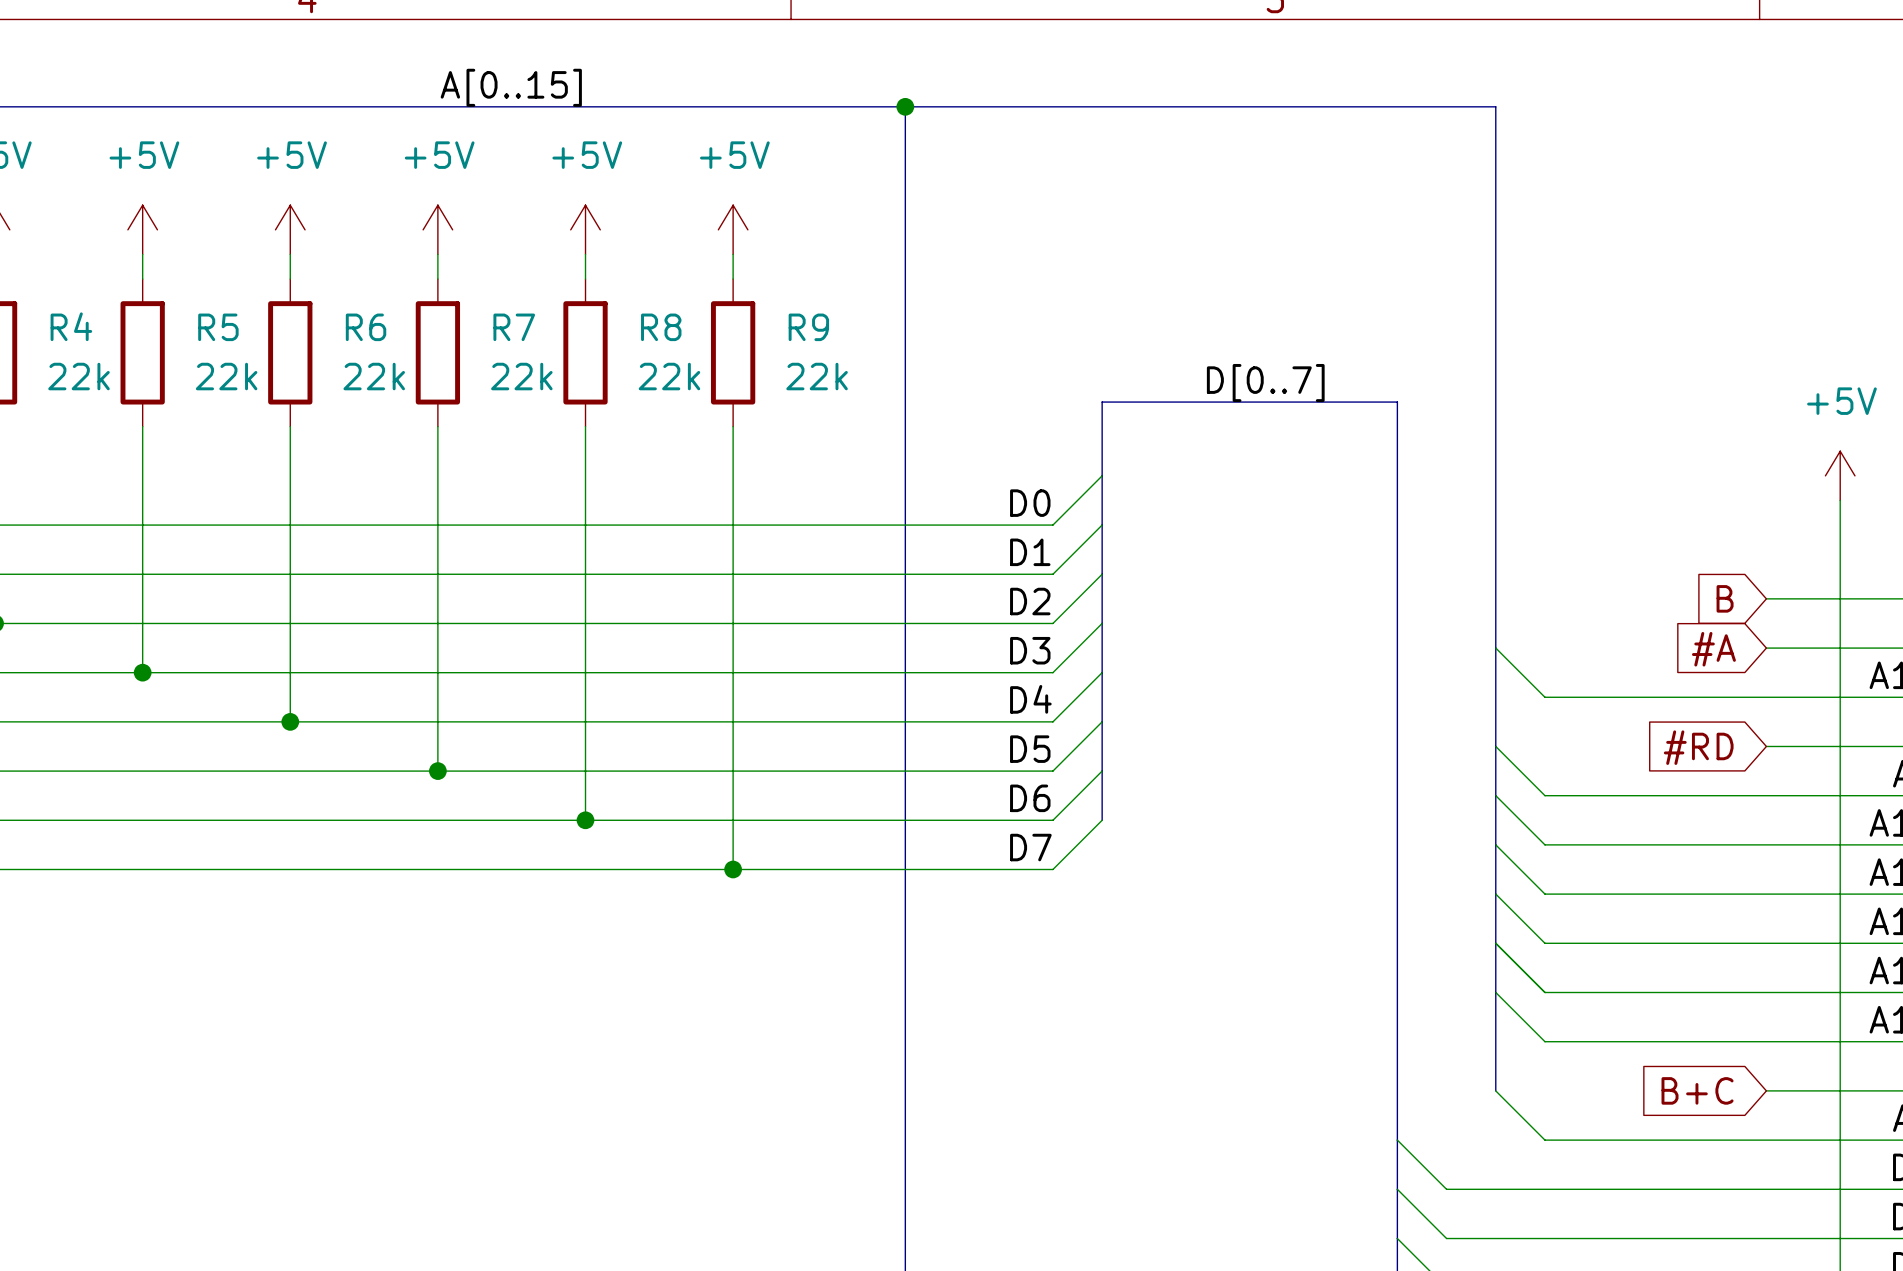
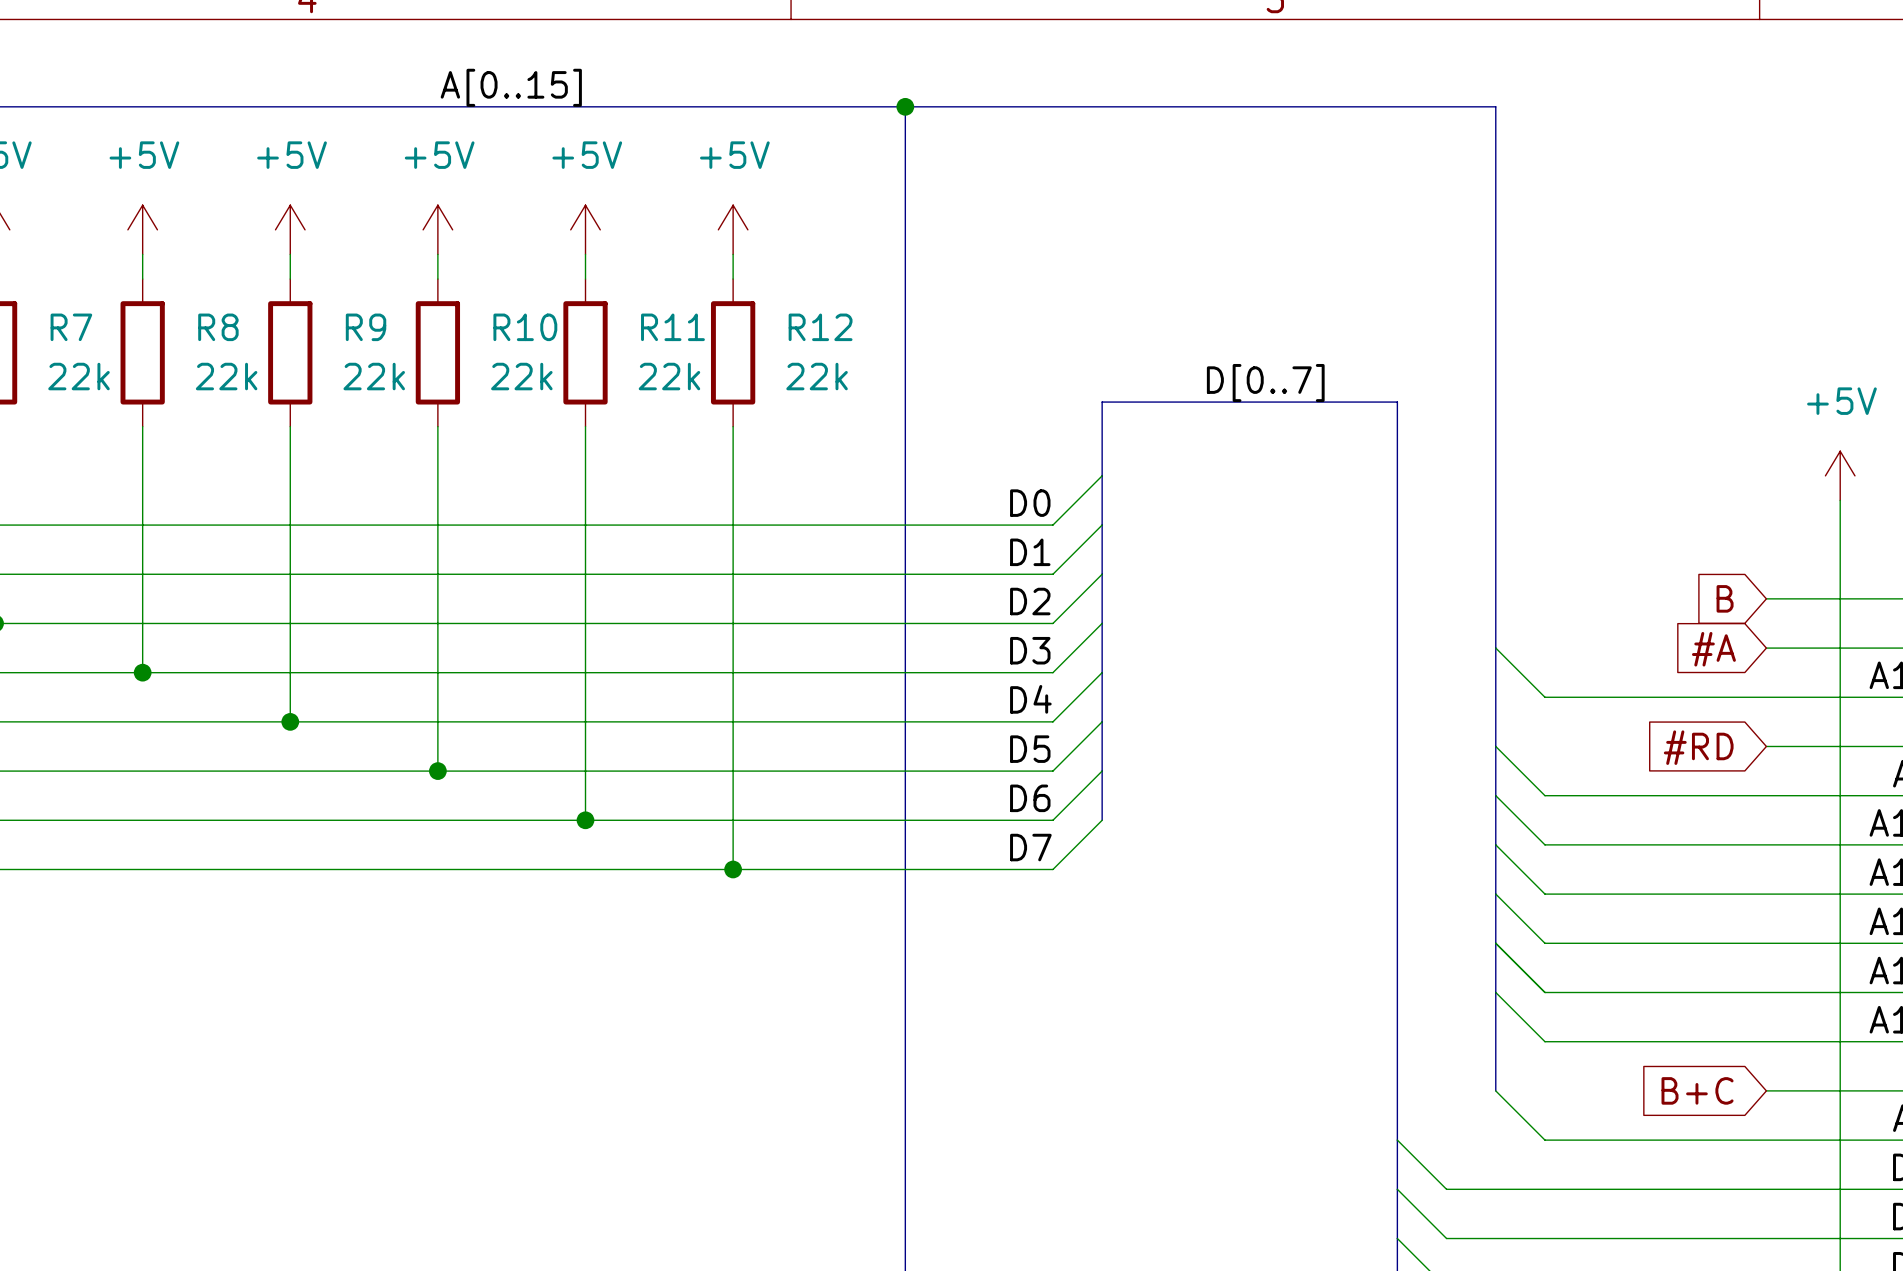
R4 name: R4 (71, 326) -> R7 (71, 327)
R5 name: R5 (218, 327) -> R8 (218, 327)
R6 name: R6 (366, 327) -> R9 (366, 327)
R7 name: R7 (514, 327) -> R10 (525, 327)
R8 name: R8 (661, 327) -> R11 (672, 327)
R9 name: R9 (808, 327) -> R12 (820, 327)

